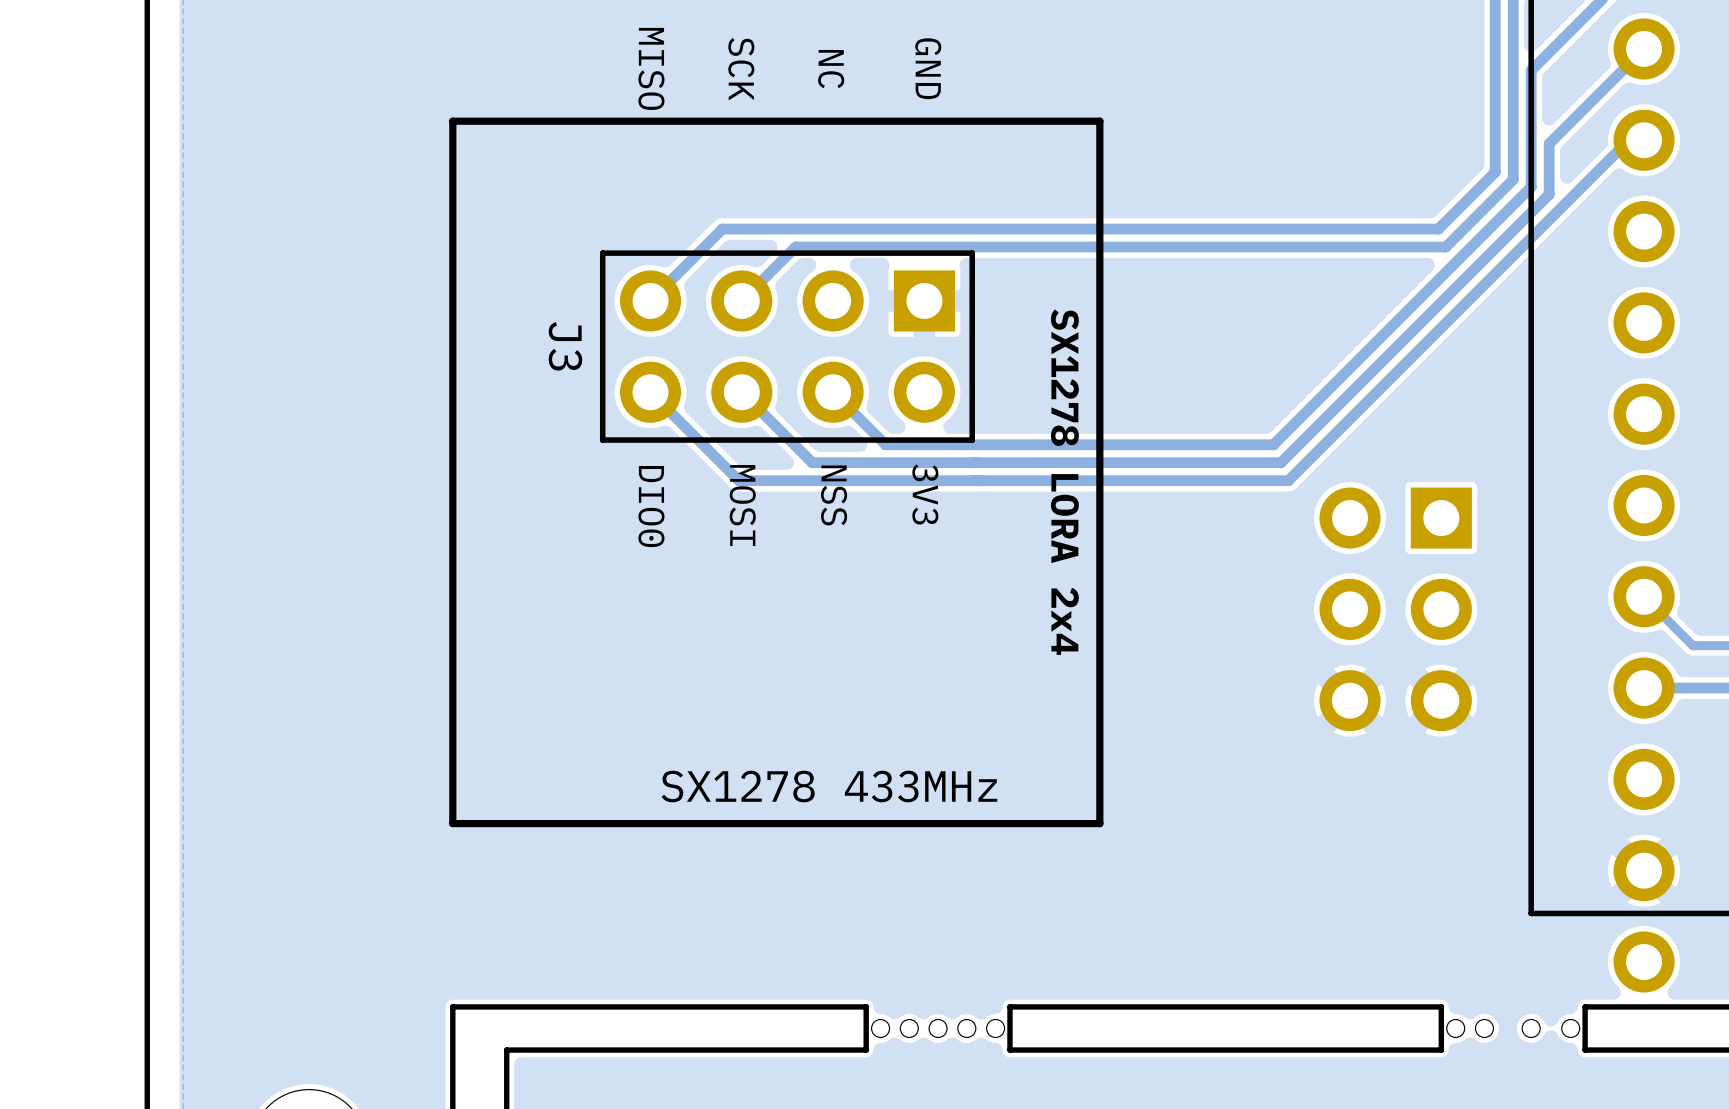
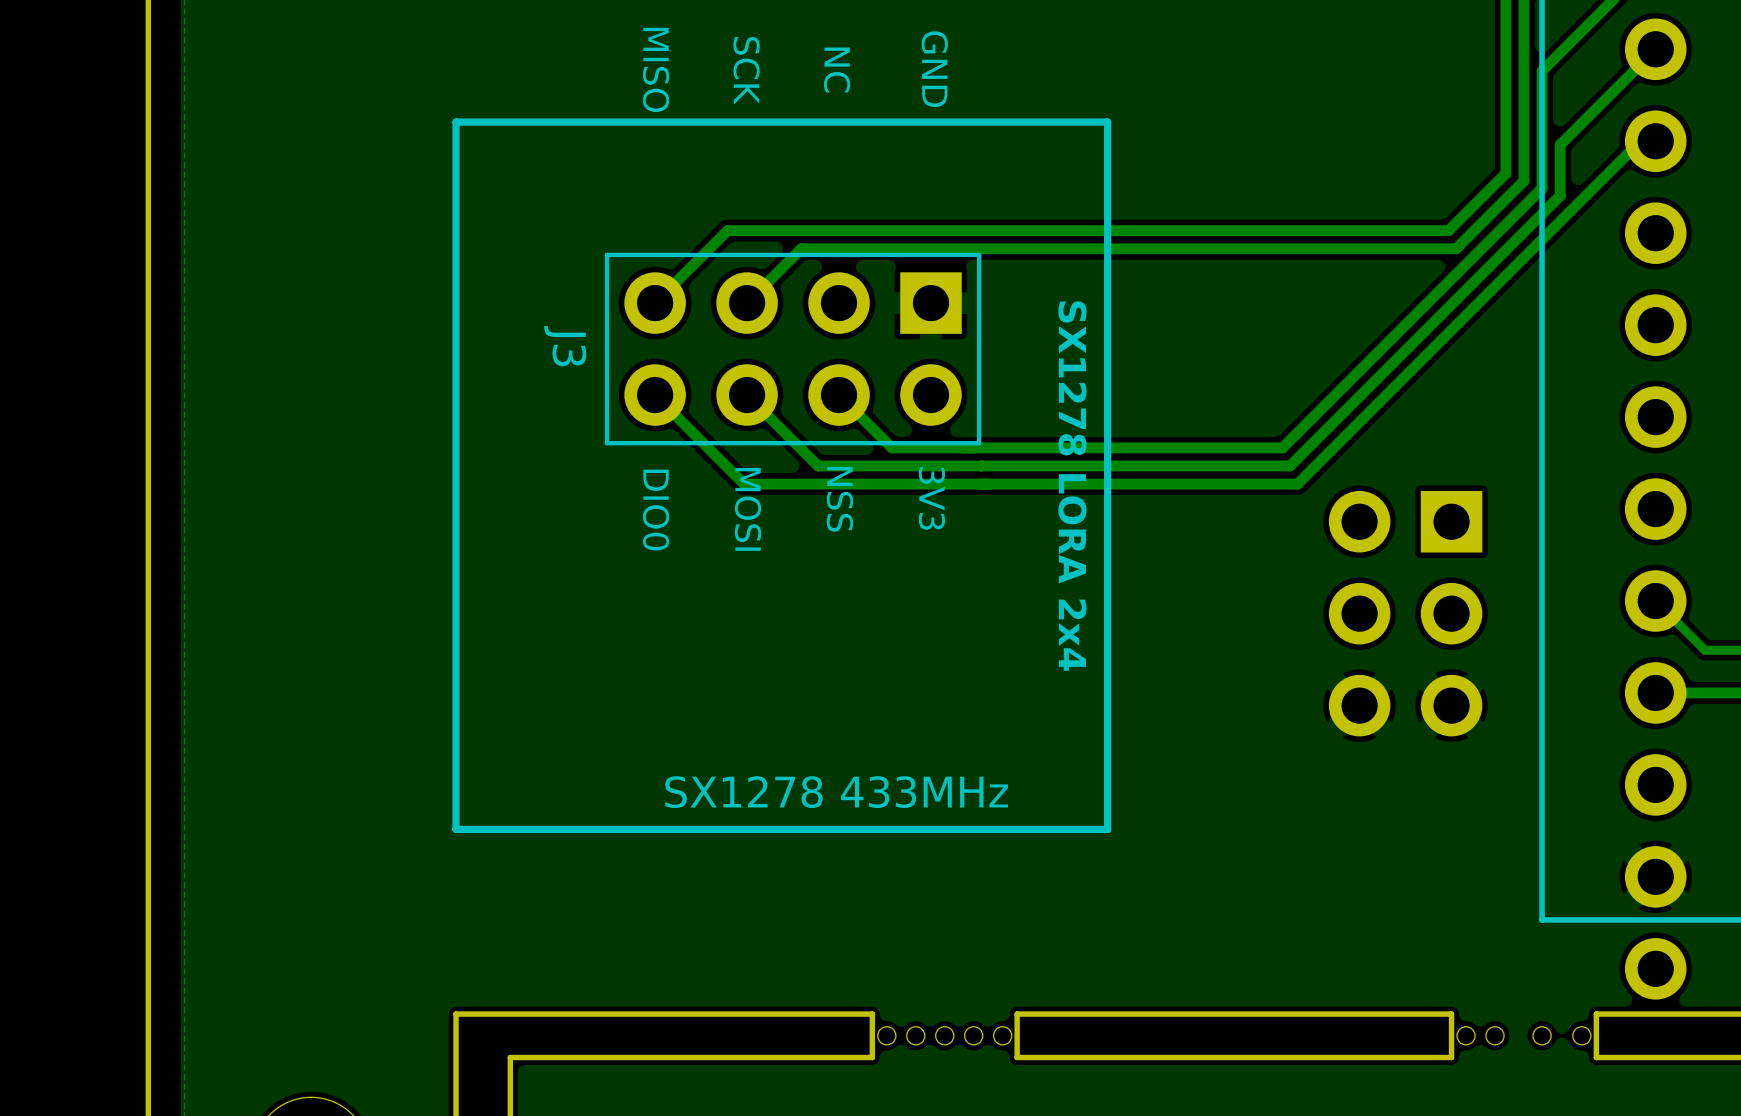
J3 footprint: [599, 250, 975, 443] -> [604, 252, 982, 446]

